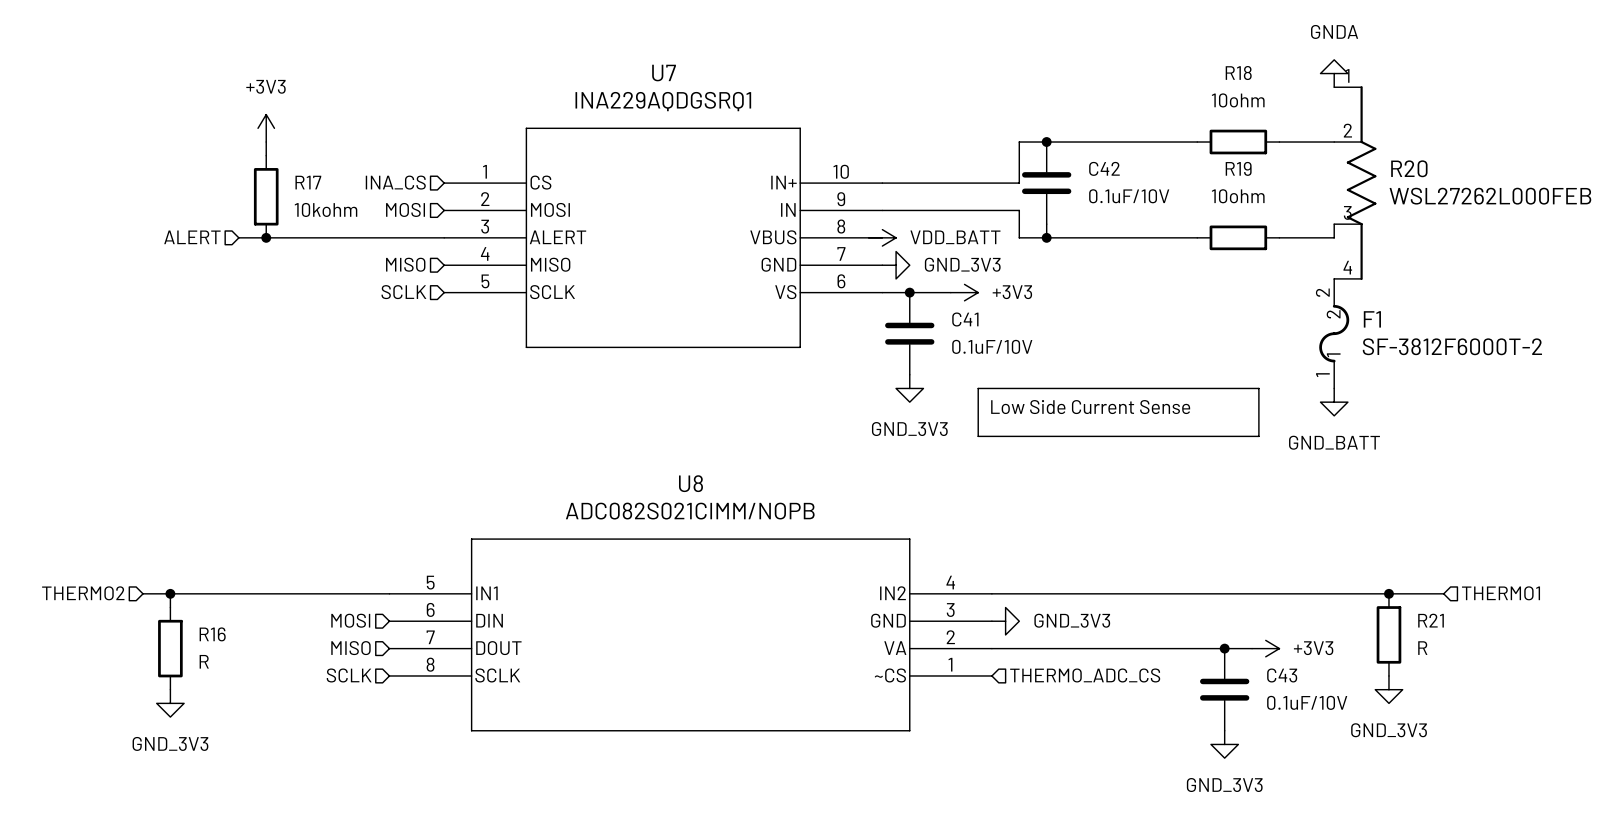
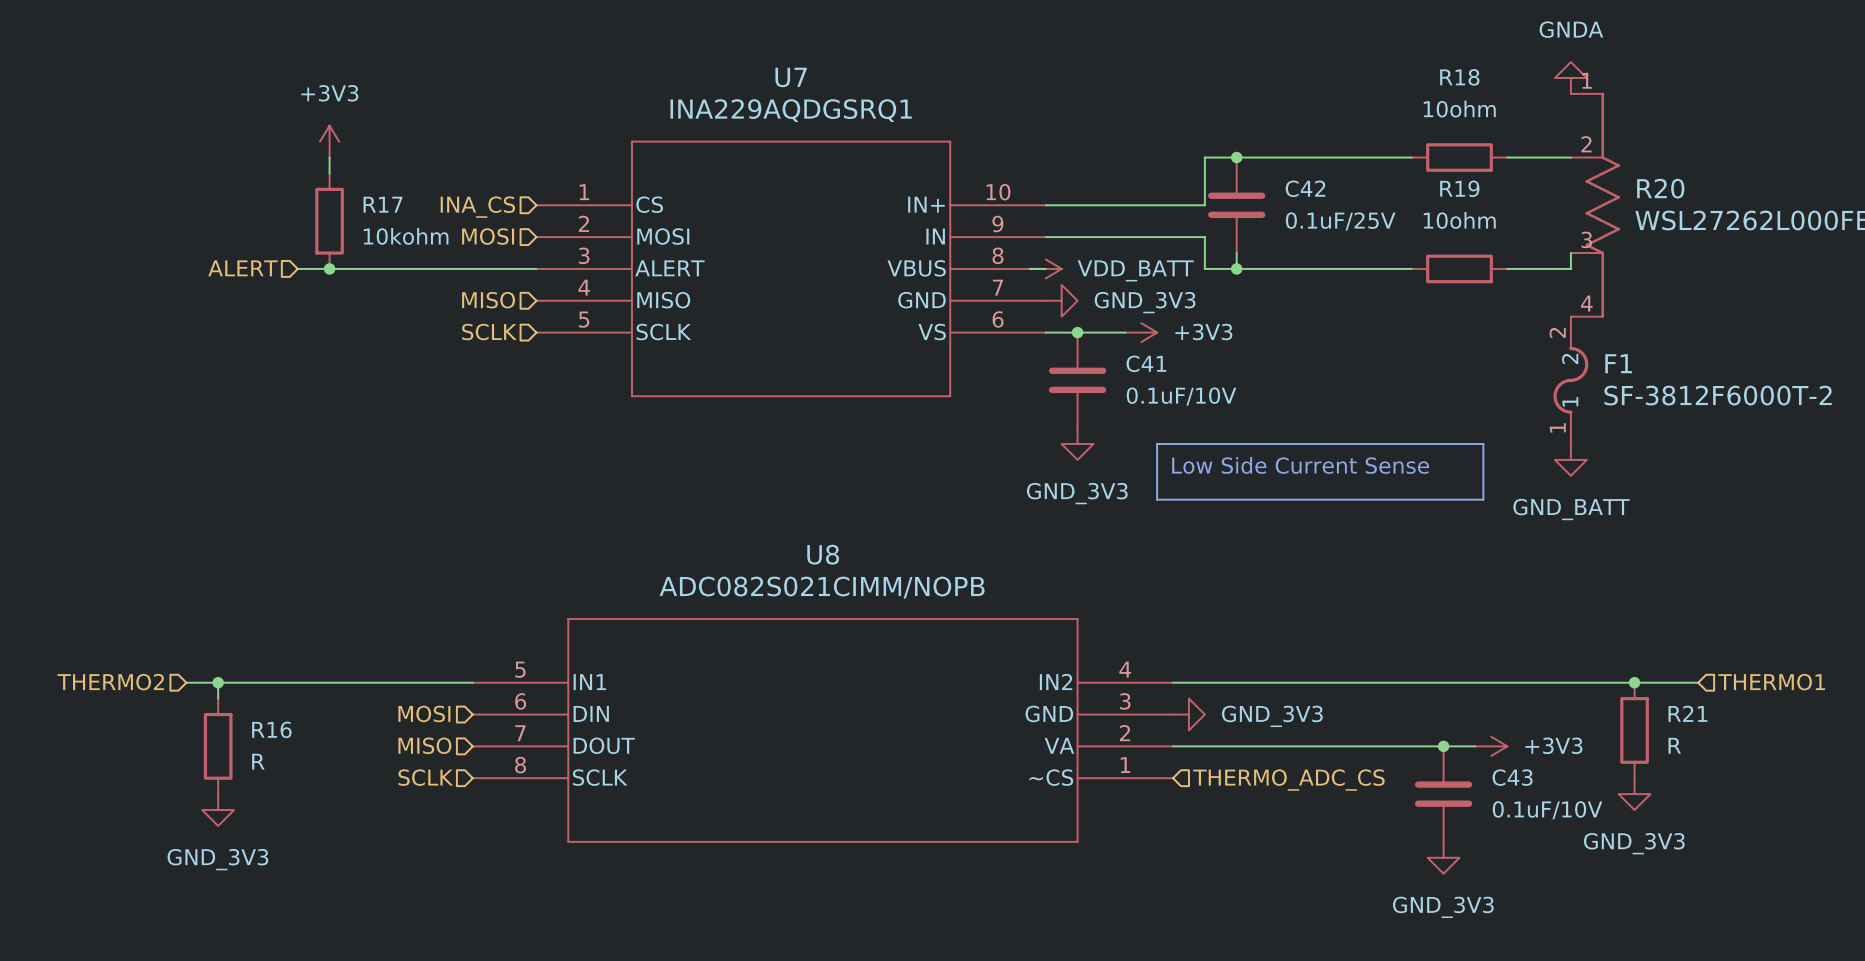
C42 value: 0.1uF/10V (1129, 196) -> 0.1uF/25V (1340, 221)

